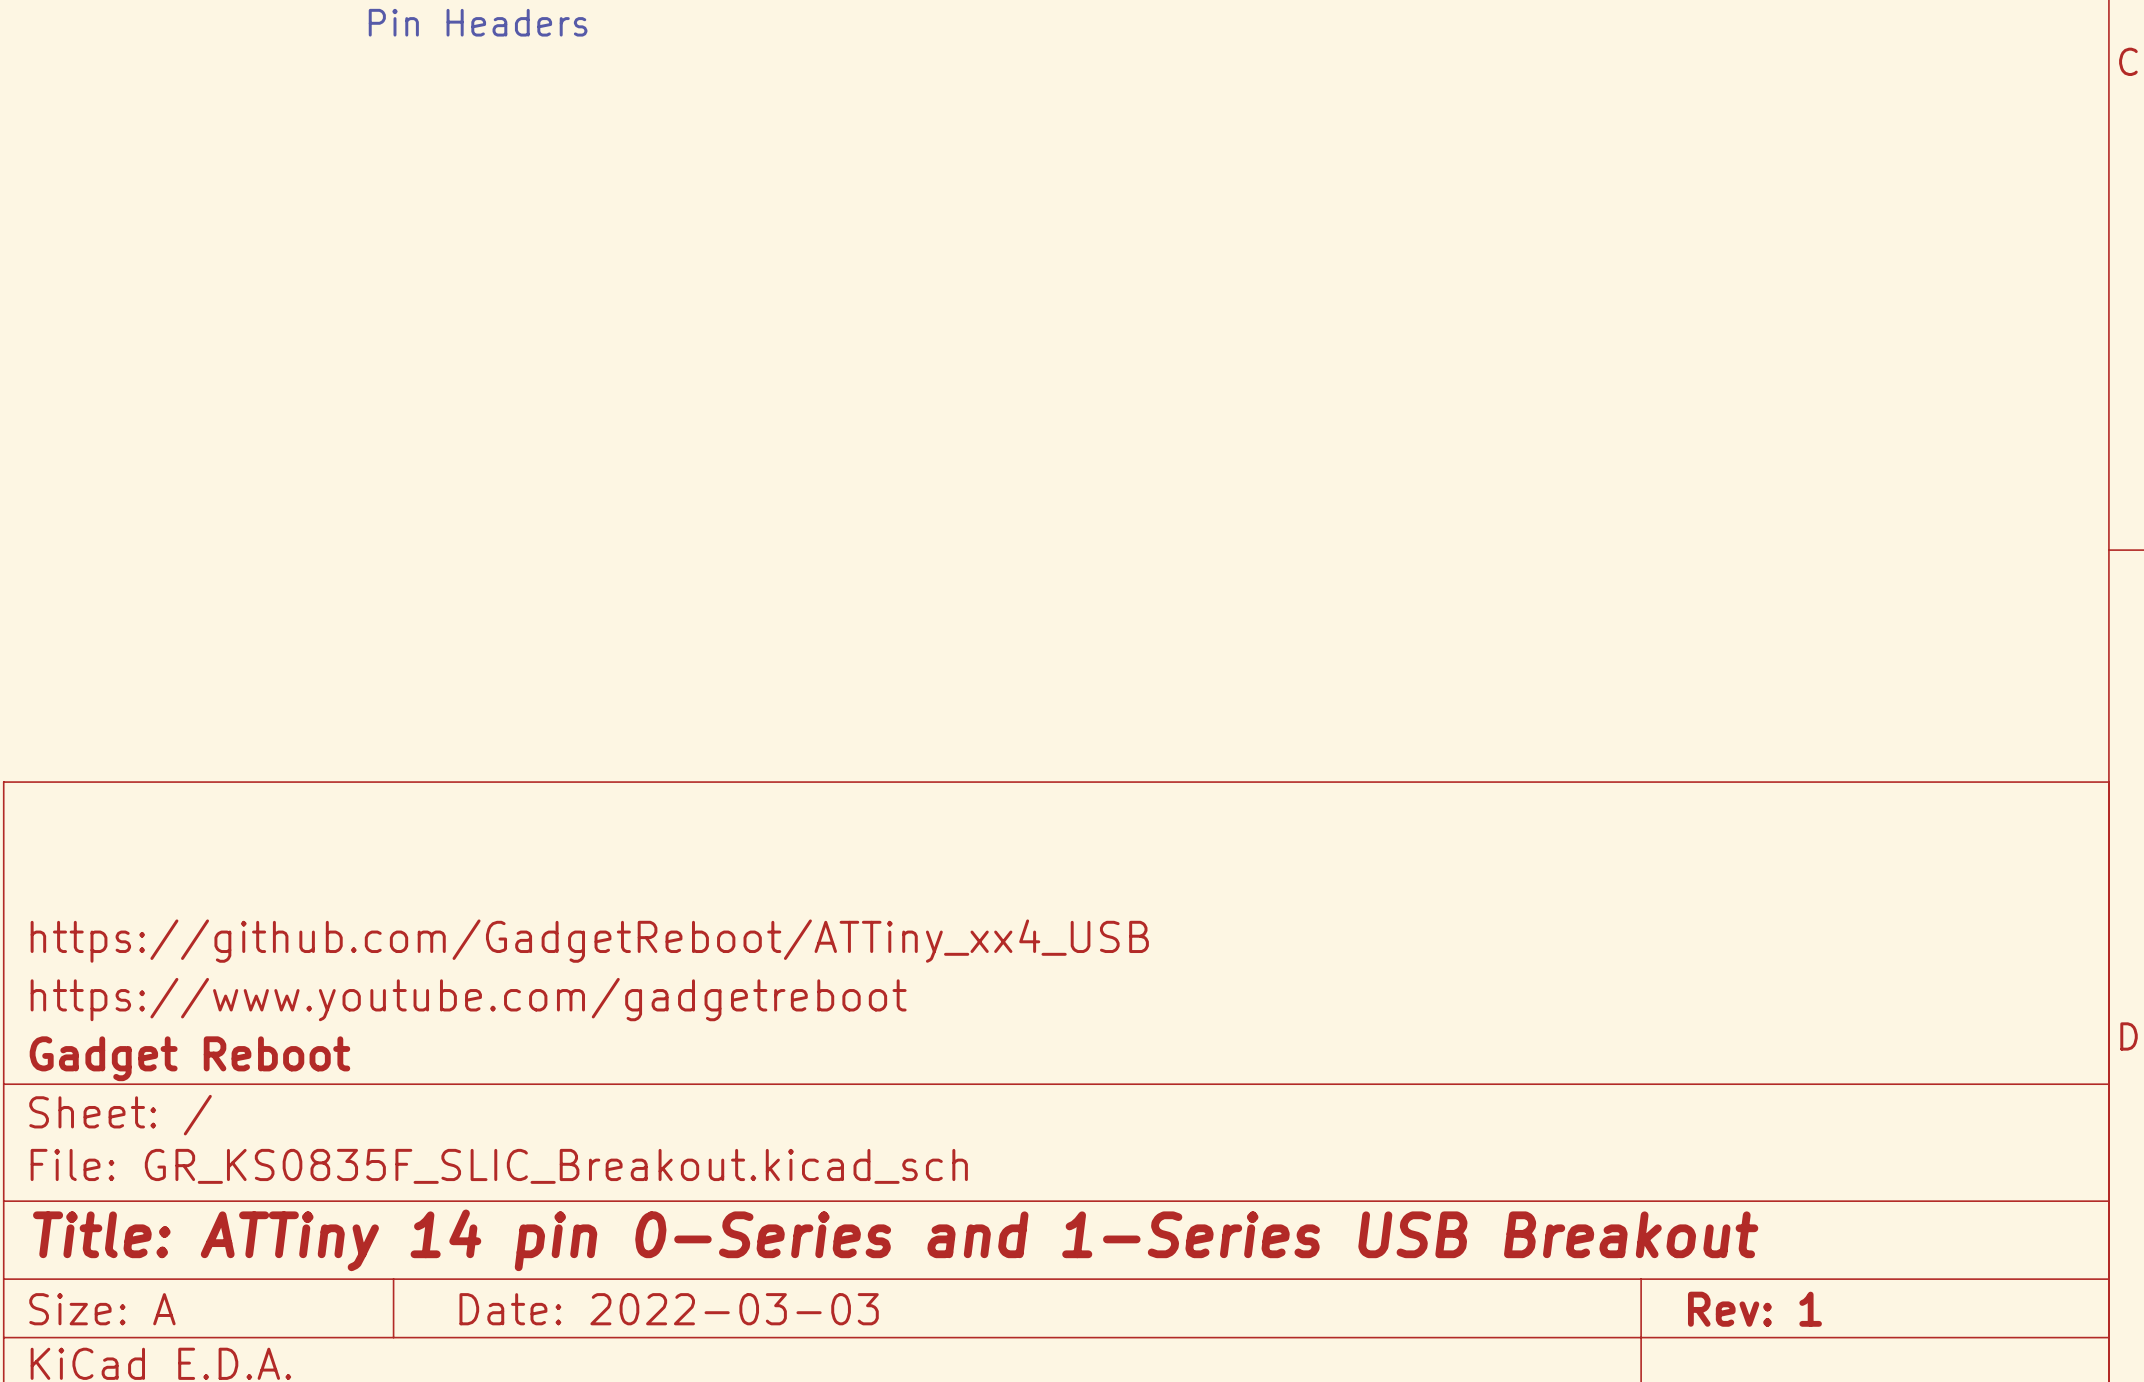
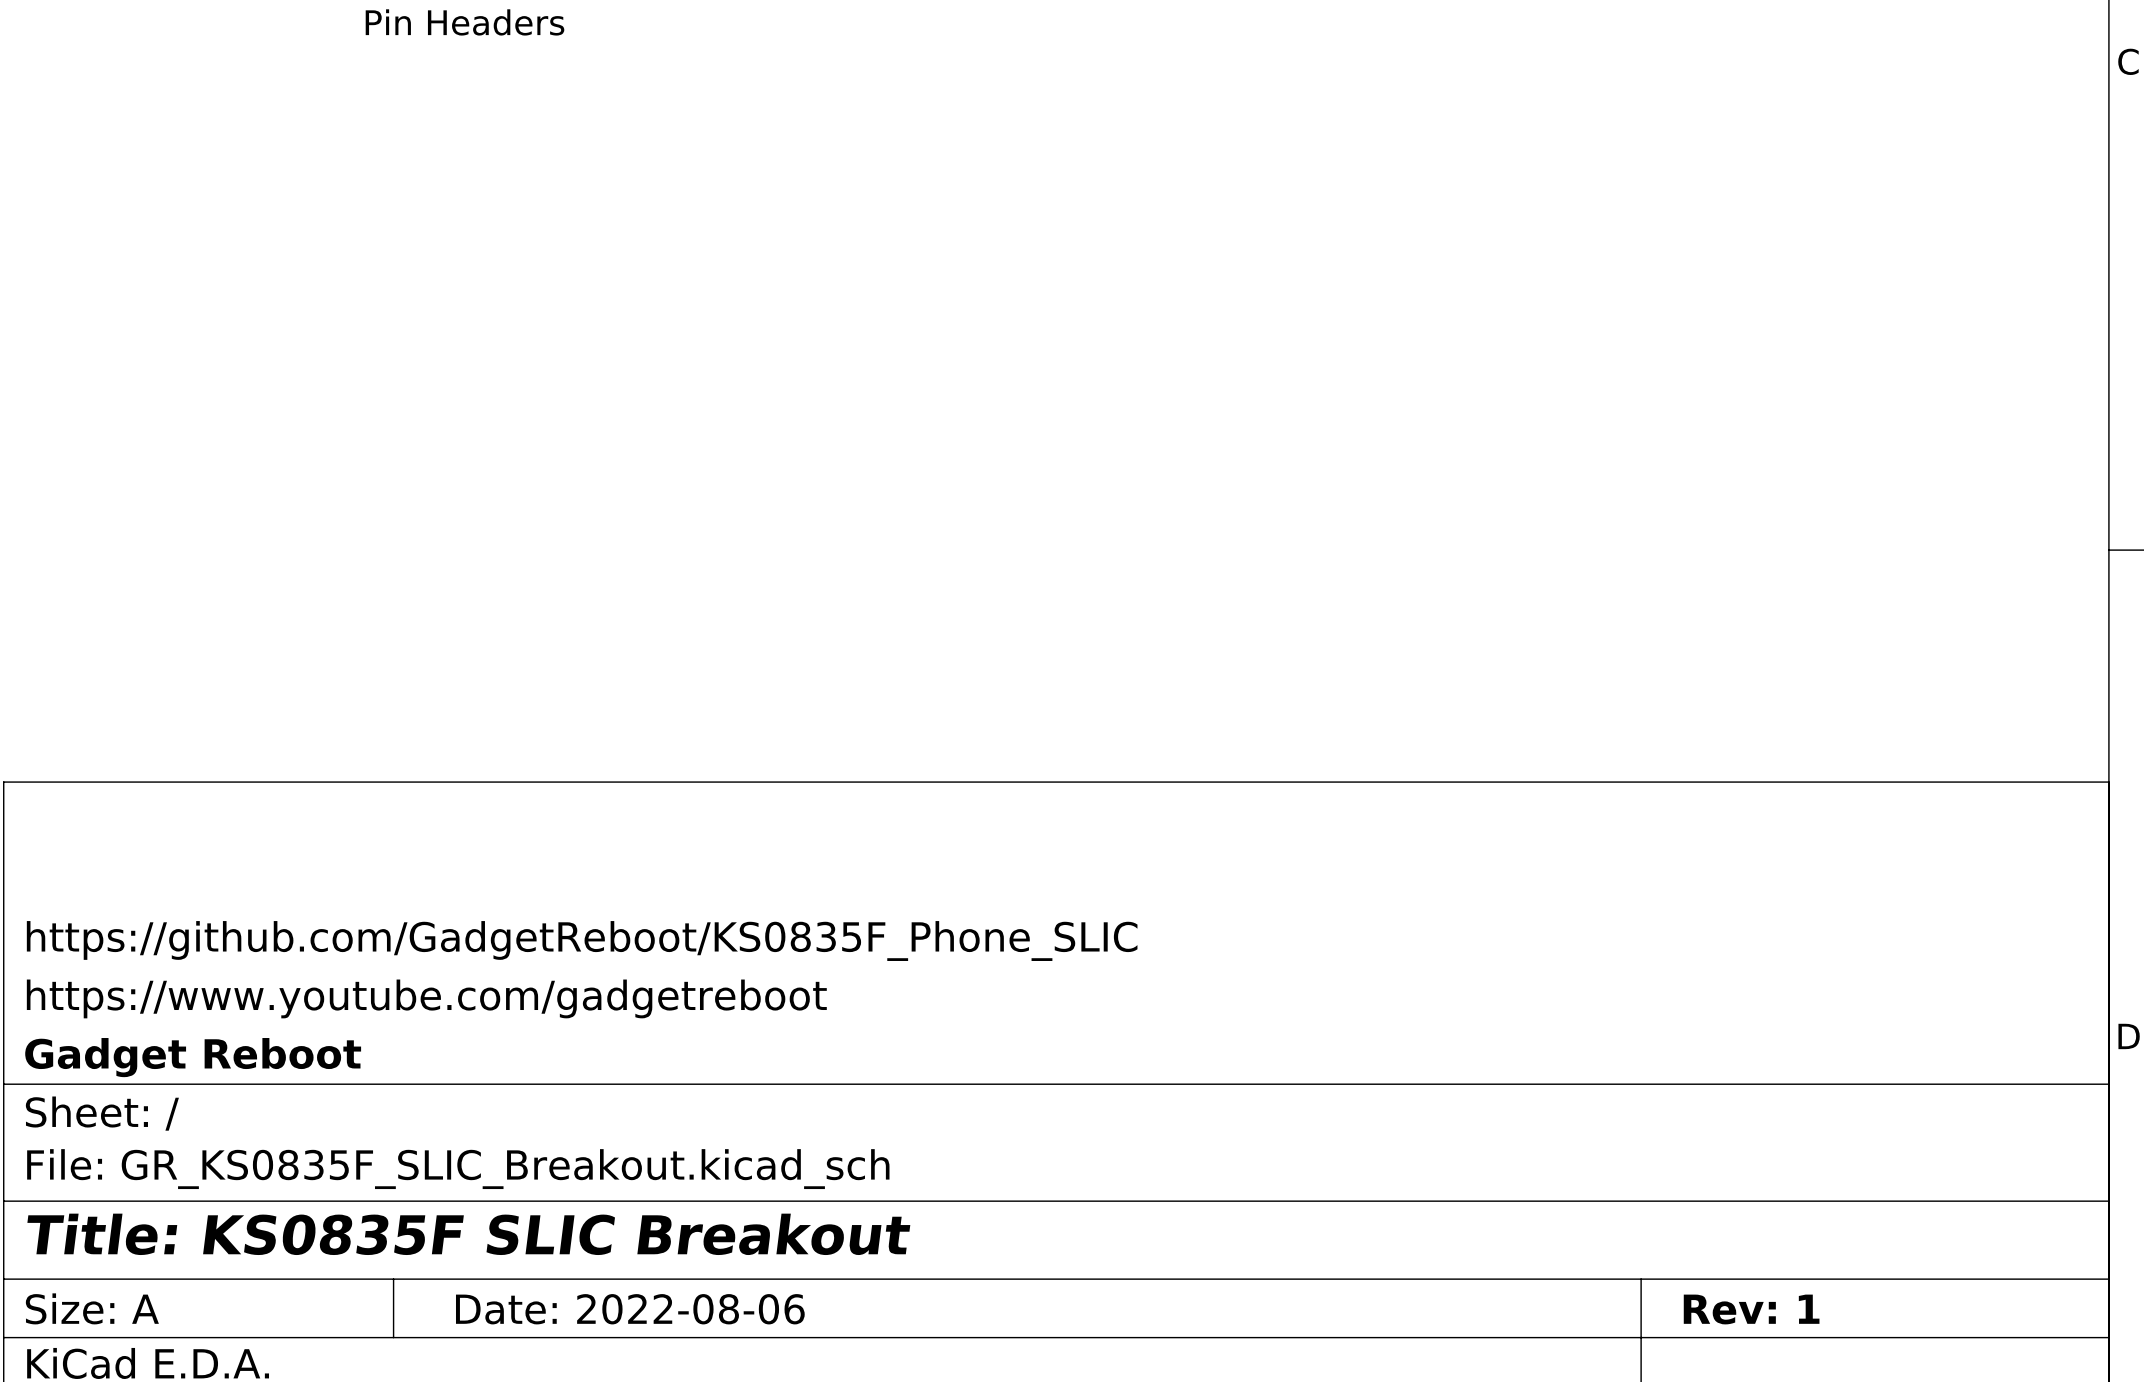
title block: https://github.com/GadgetReboot/ATTiny_xx4_USB (589, 941) -> https://github.com/GadgetReboot/KS0835F_Phone_SLIC (582, 941)
title block: Title: ATTiny 14 pin 0-Series and 1-Series USB Breakout (895, 1240) -> Title: KS0835F SLIC Breakout (468, 1234)
title block: Date: 2022-03-03 (669, 1309) -> Date: 2022-08-06 (630, 1309)

